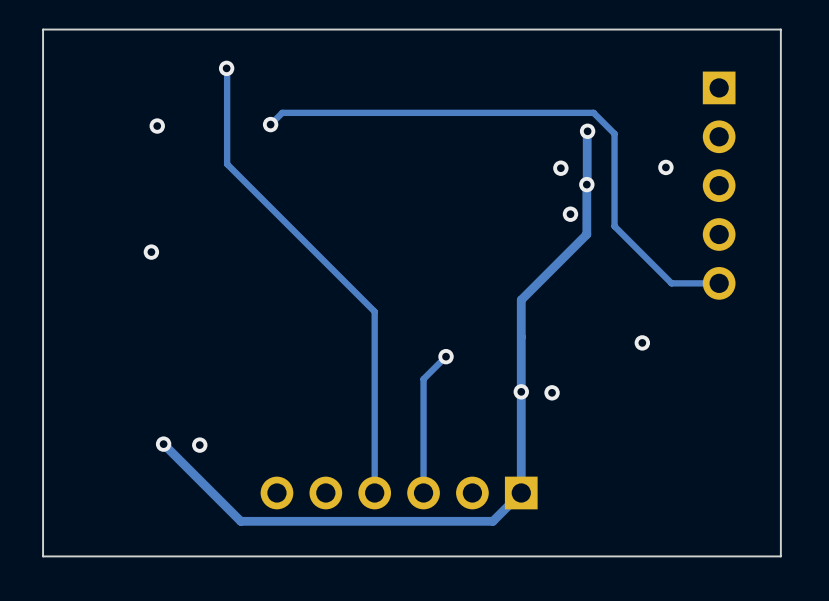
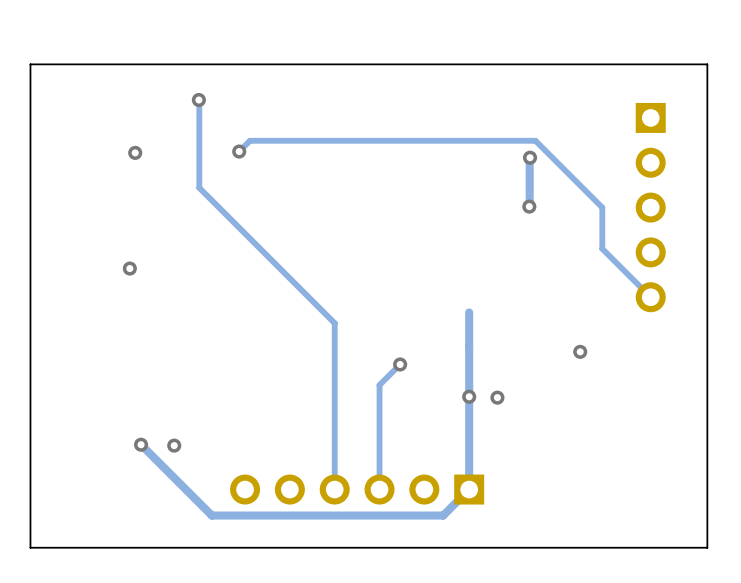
track: (614, 133) (614, 226) (671, 283) (719, 283) -> (554, 160) (602, 207) (602, 248) (650, 297)
via: (665, 167) -> none
via: (560, 168) -> none
track: (586, 184) (586, 234) (521, 299) -> none
via: (570, 214) -> none

